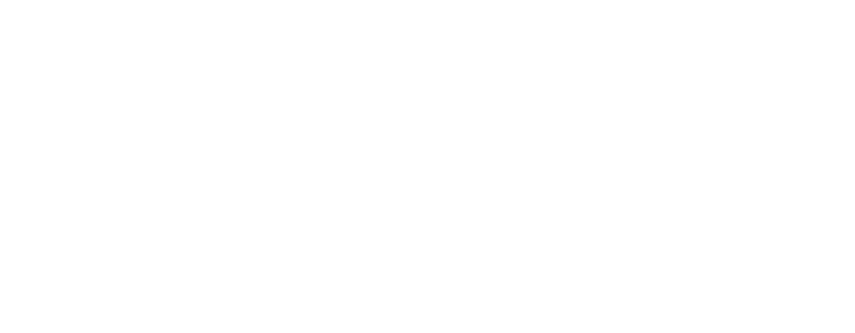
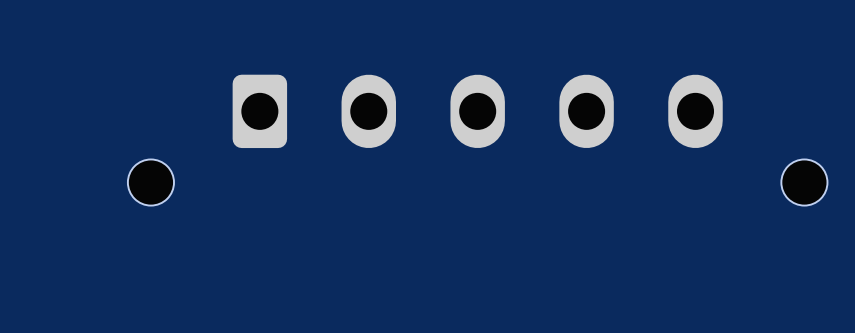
part: none -> (477, 140)

